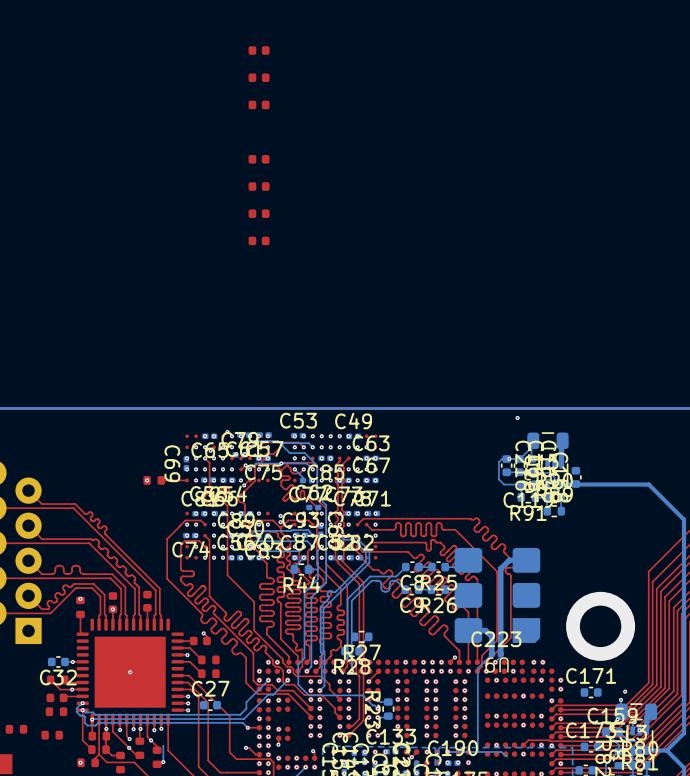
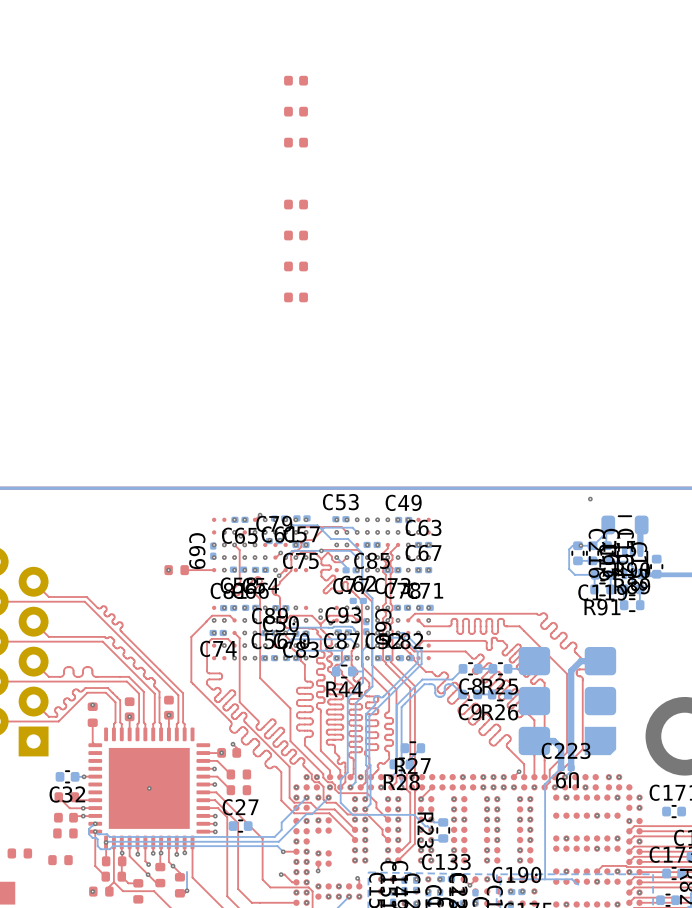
via: none -> (168, 715)
via: none -> (221, 752)
via: none -> (214, 784)
via: none -> (83, 816)

